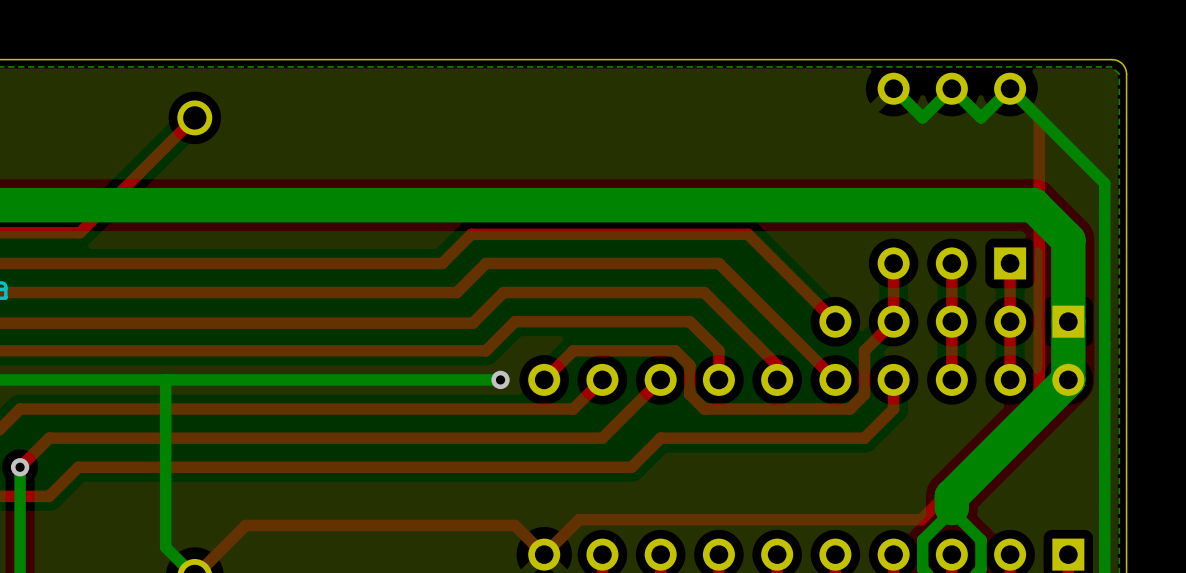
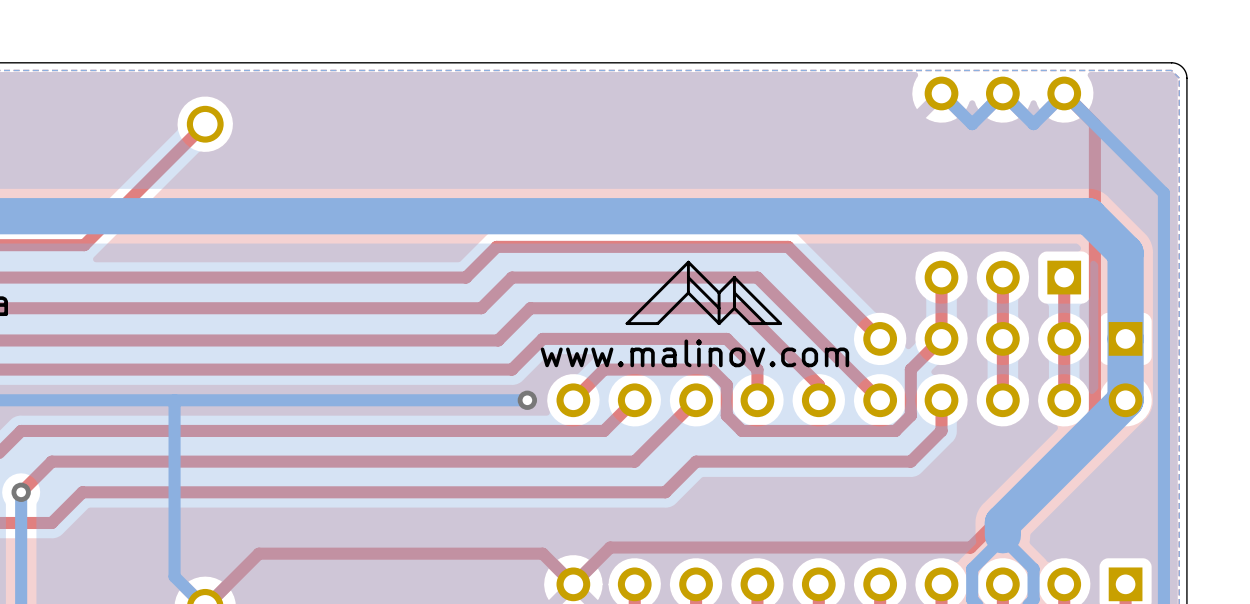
line: none -> (688, 262) (719, 292)
line: none -> (688, 262) (688, 292)
line: none -> (688, 262) (627, 323) (657, 323) (688, 292)
line: none -> (688, 277) (719, 308)
line: none -> (734, 277) (780, 323) (749, 323) (734, 308)
line: none -> (734, 277) (734, 308)
line: none -> (734, 277) (719, 292)
line: none -> (688, 292) (719, 323)
line: none -> (719, 292) (719, 323)
line: none -> (734, 292) (765, 323)
line: none -> (734, 308) (719, 323)
text: none -> www.malinov.com (694, 353)

